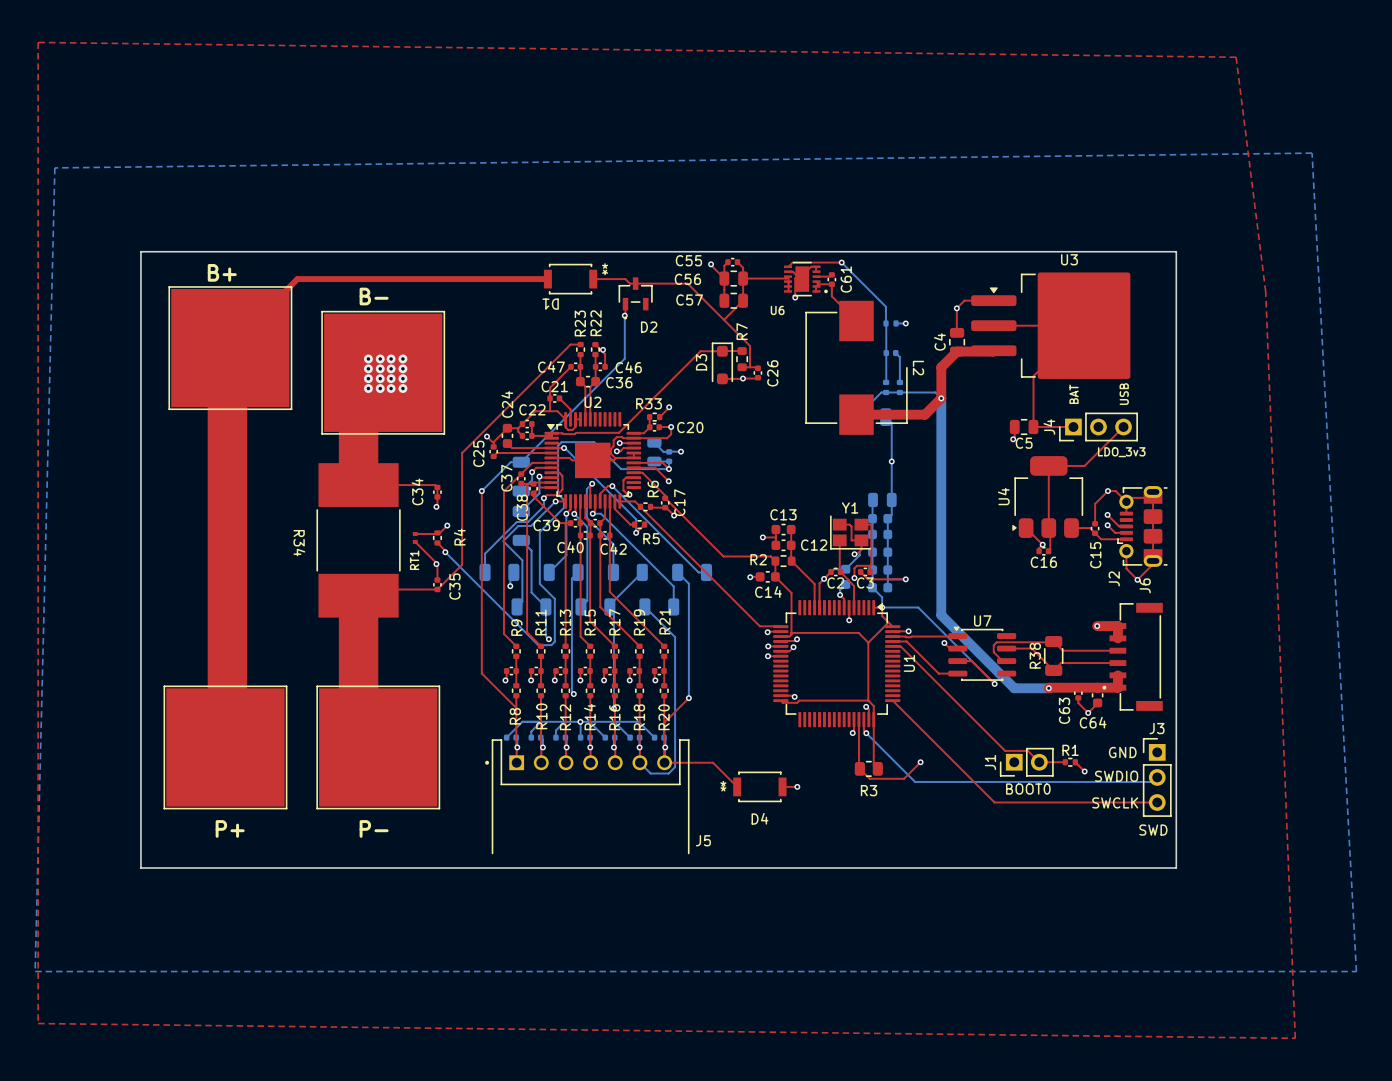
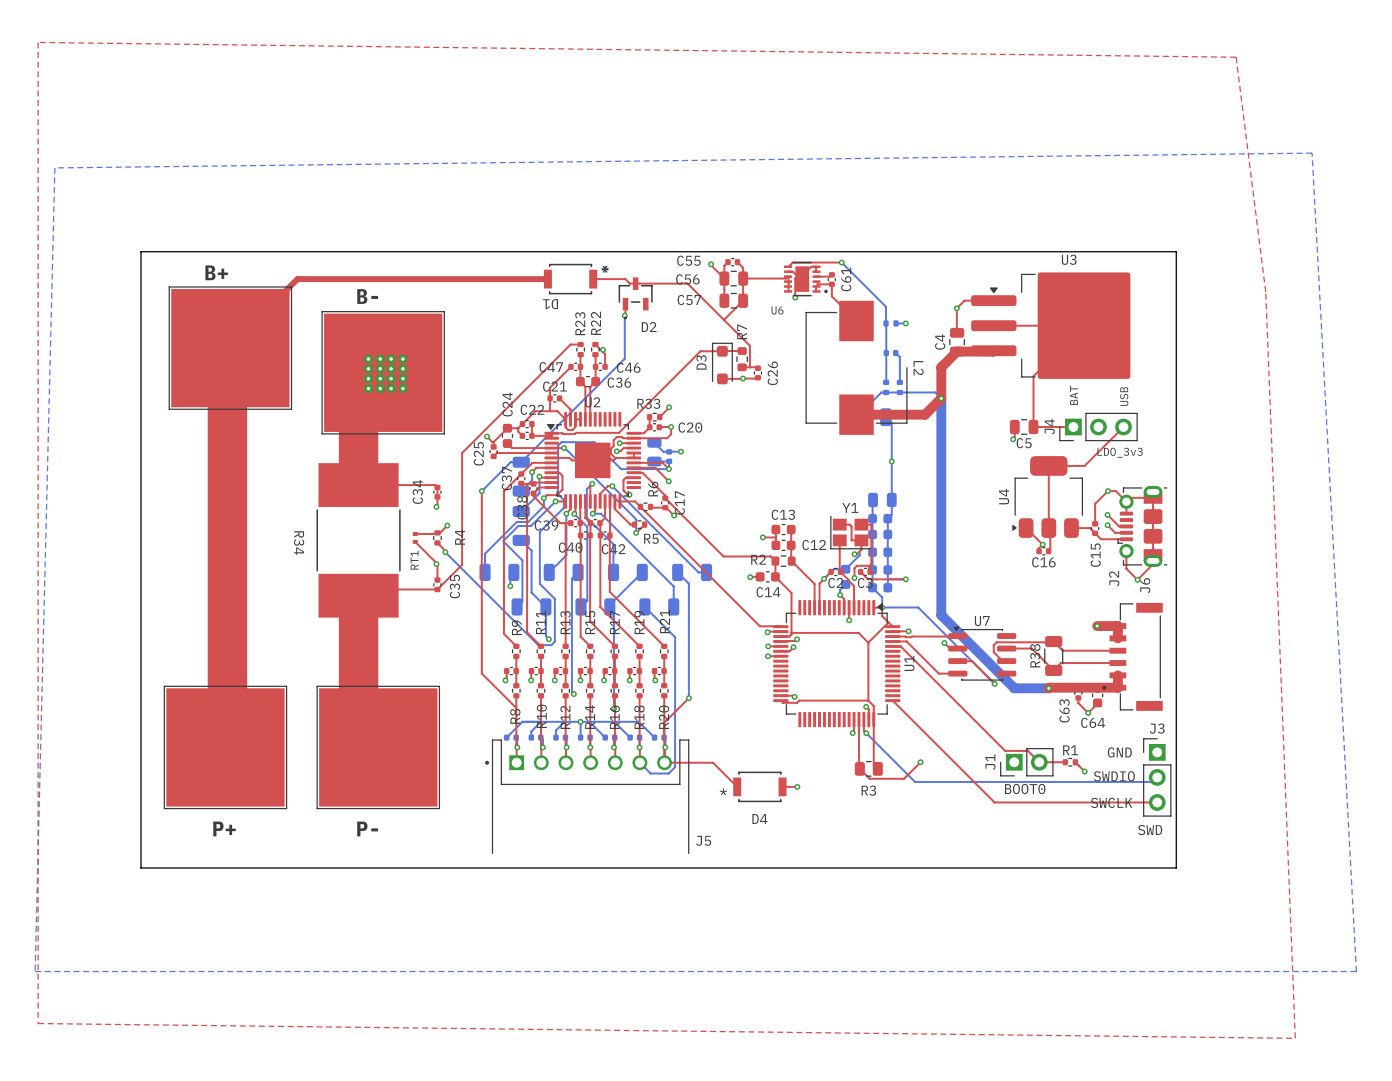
D4 text: * (723, 783) -> none
D4 text: * (723, 788) -> none
text: none -> * (723, 791)

